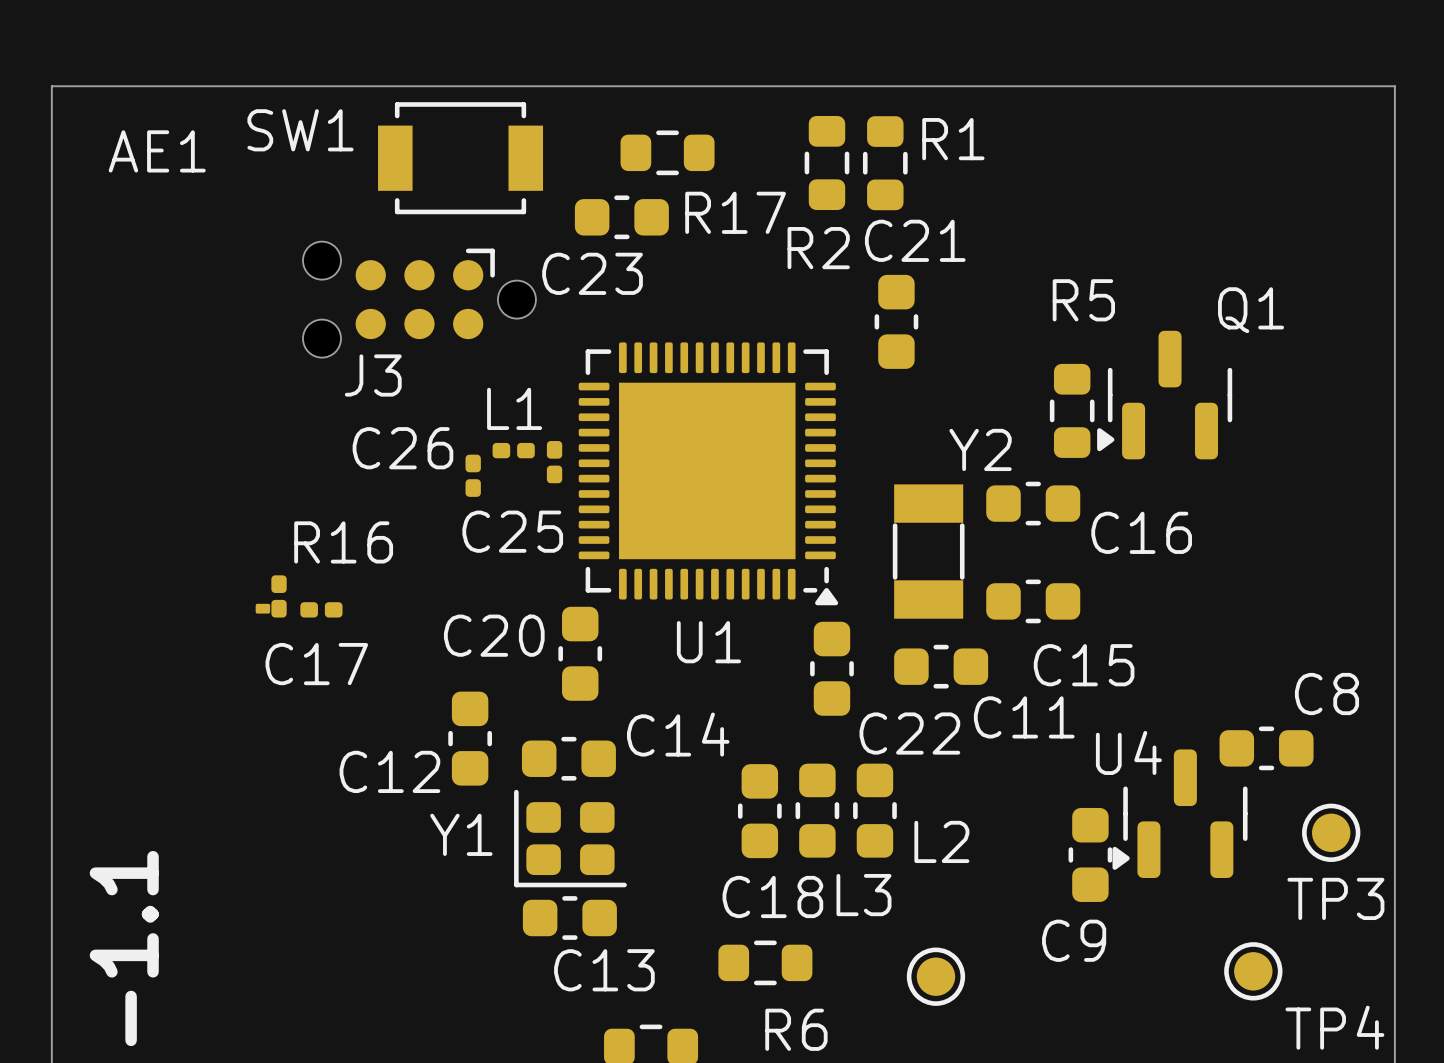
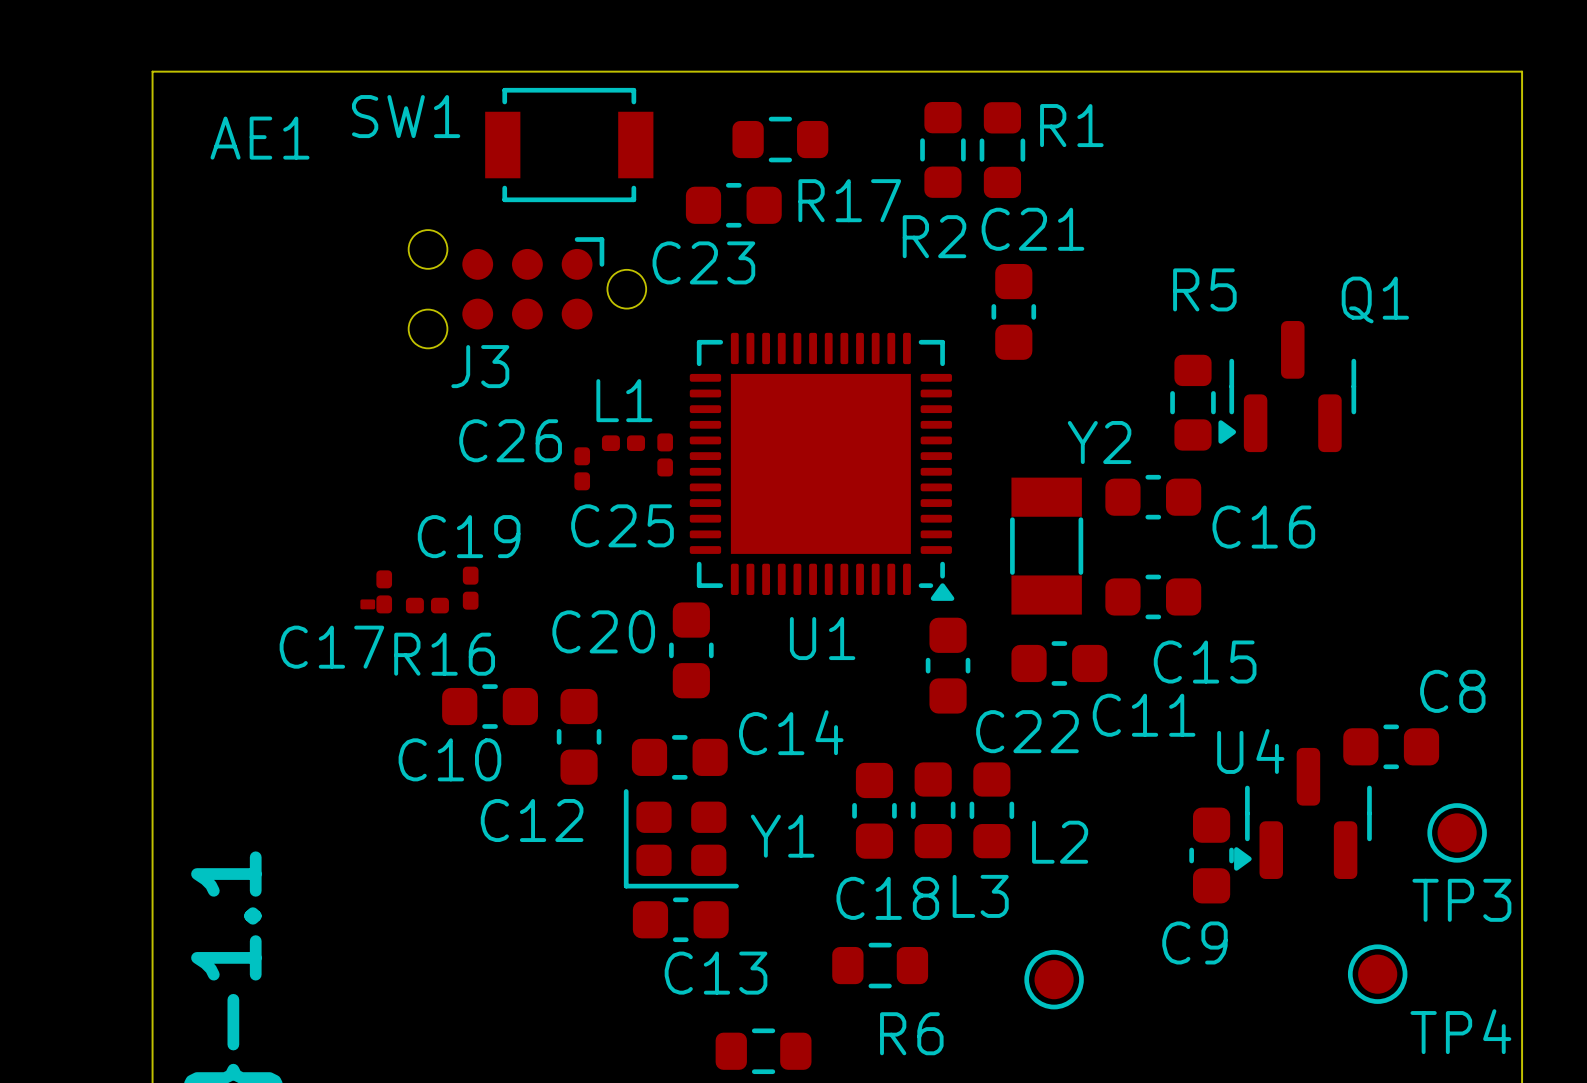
R16 name position: R16 (343, 542) -> R16 (444, 654)
C19: none -> (470, 588)
C17 name position: C17 (316, 664) -> C17 (331, 647)
C10: none -> (490, 706)
C12 name position: C12 (389, 771) -> C12 (532, 820)
Y1 name position: Y1 (461, 834) -> Y1 (782, 836)

